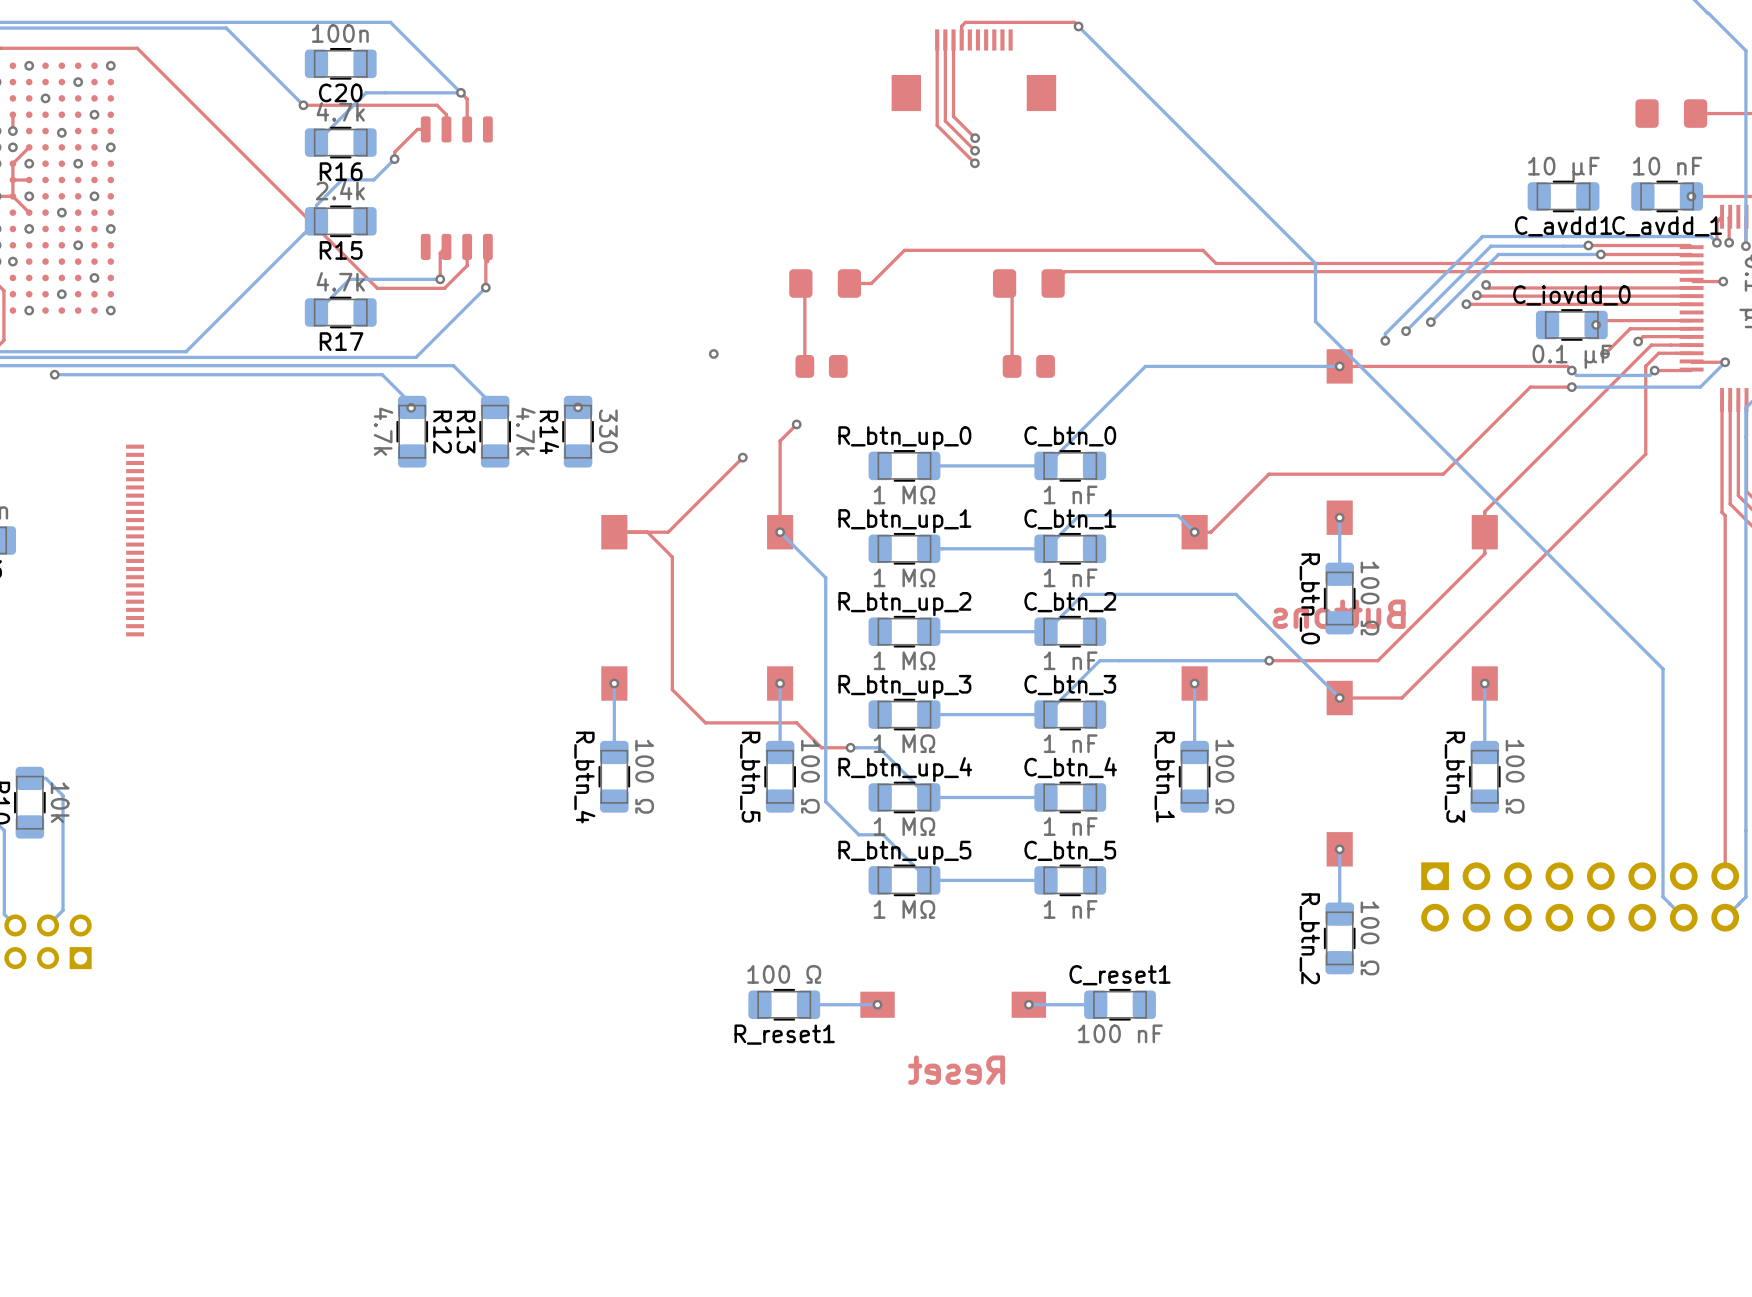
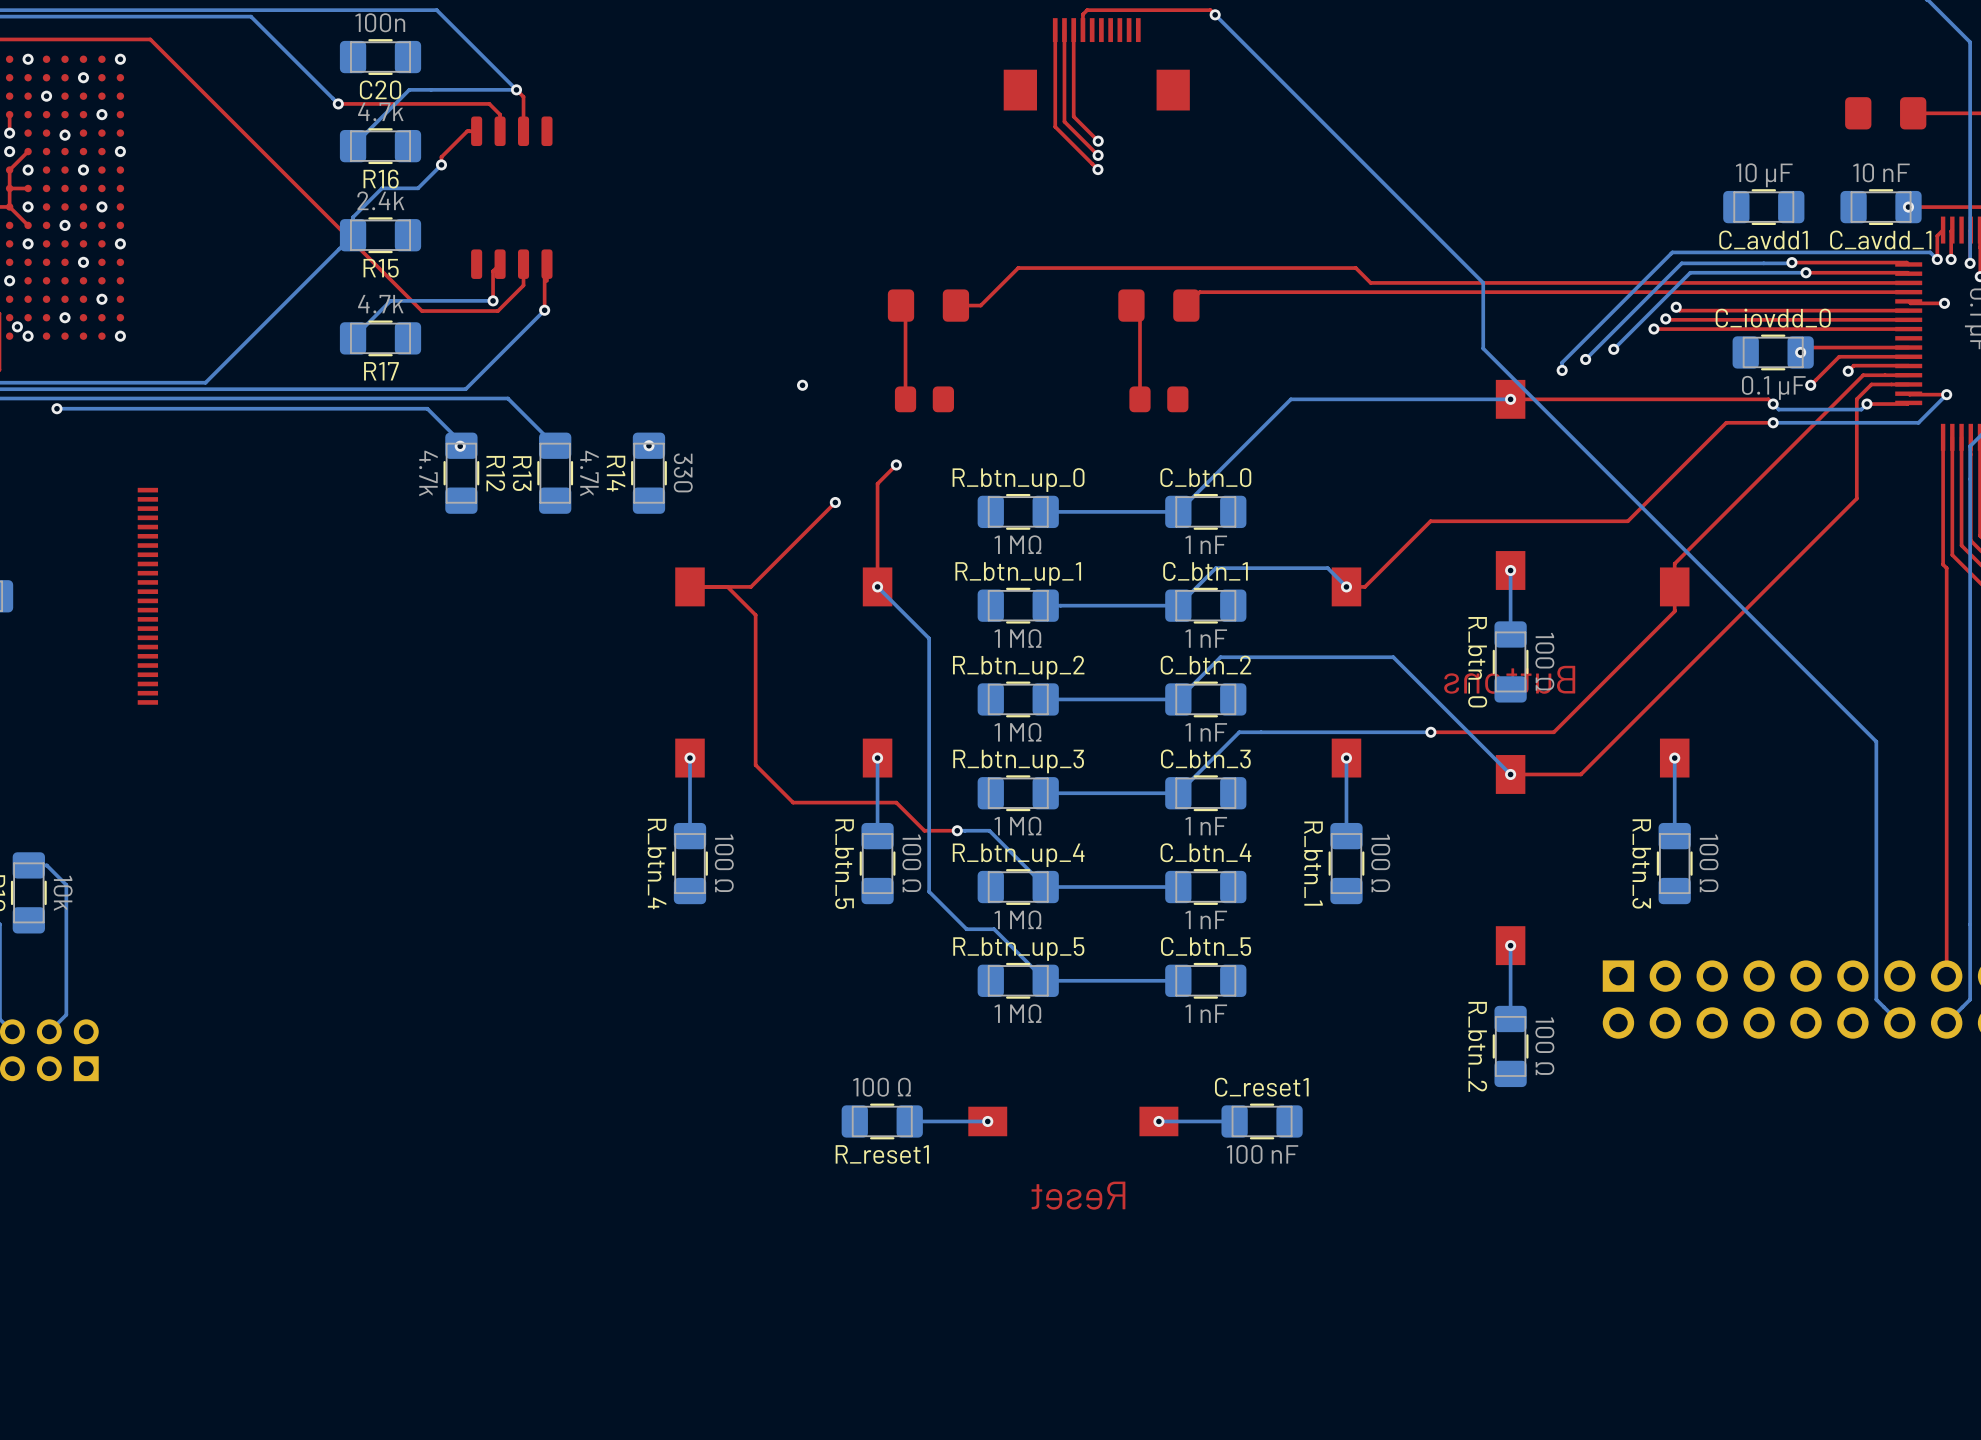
via: none -> (17, 326)

